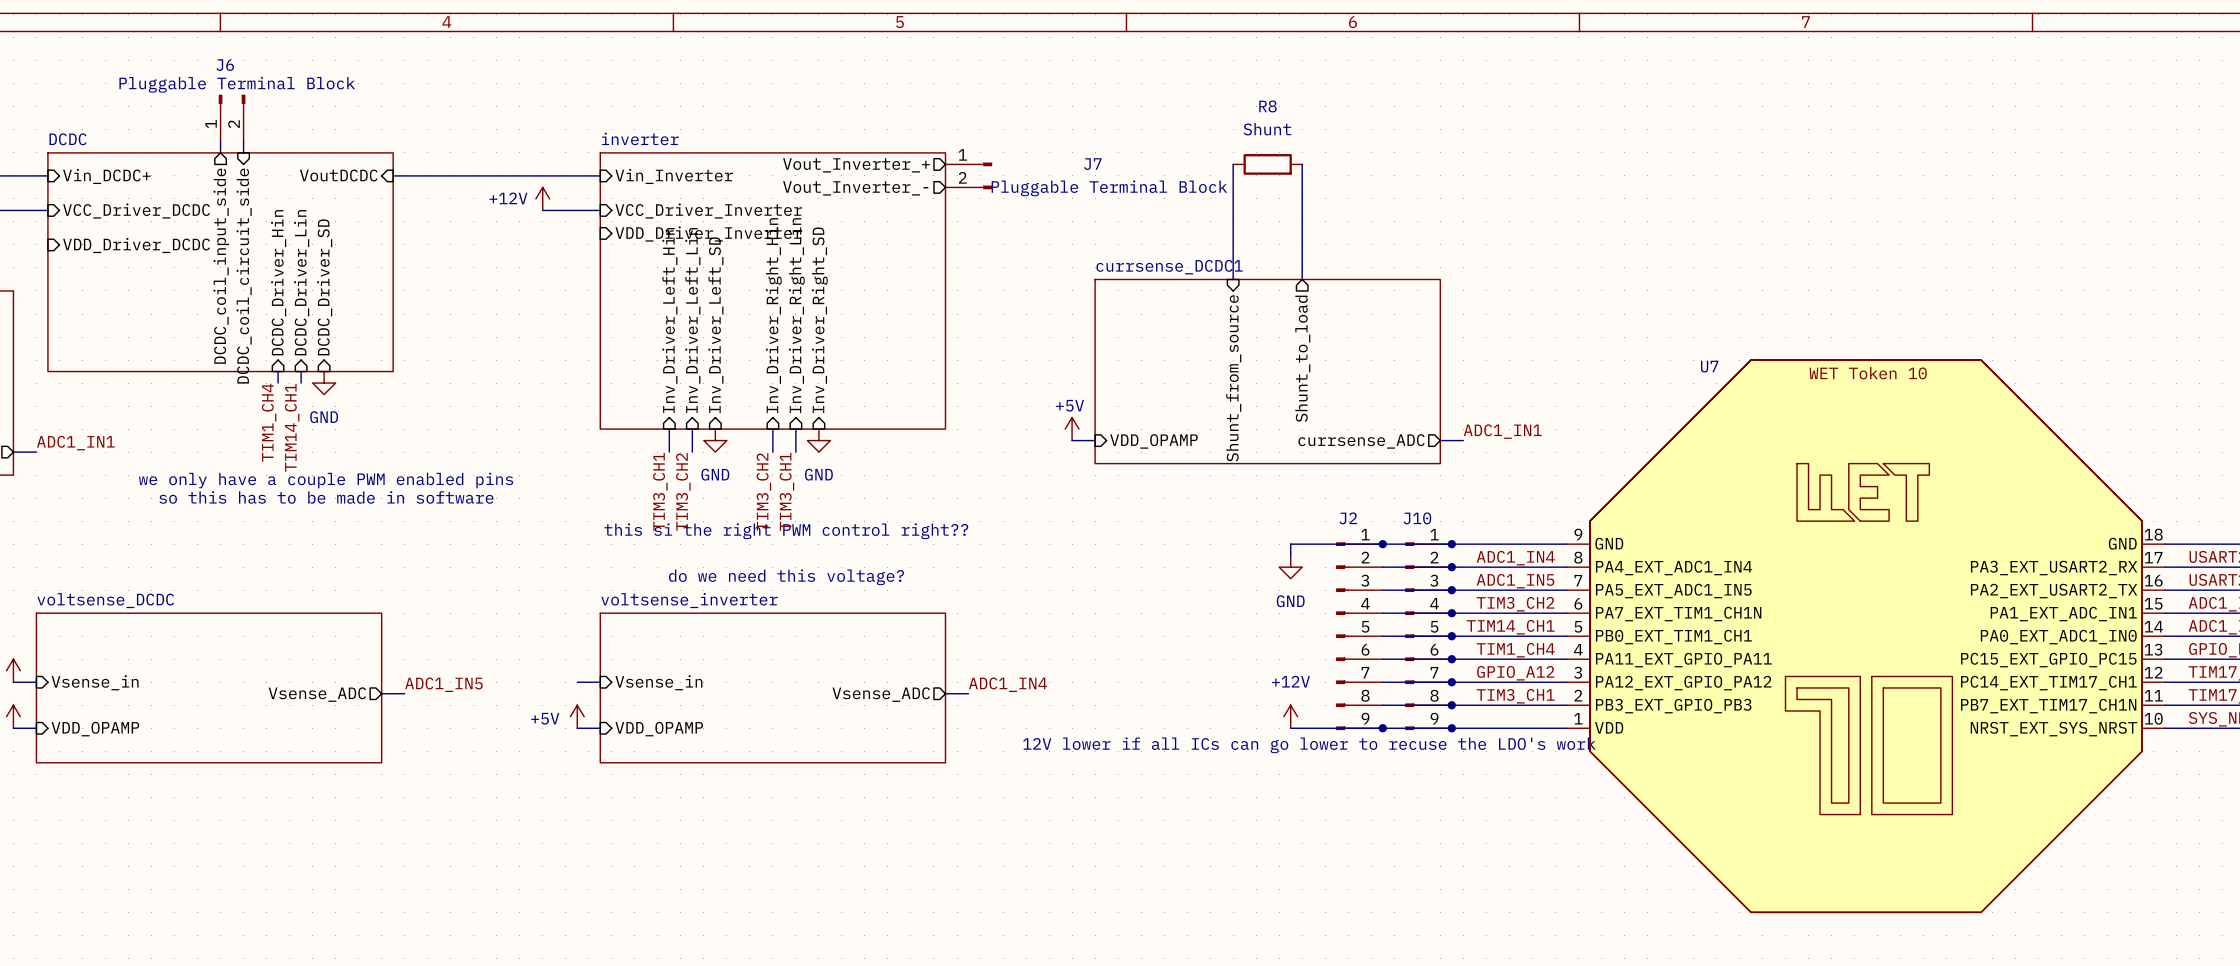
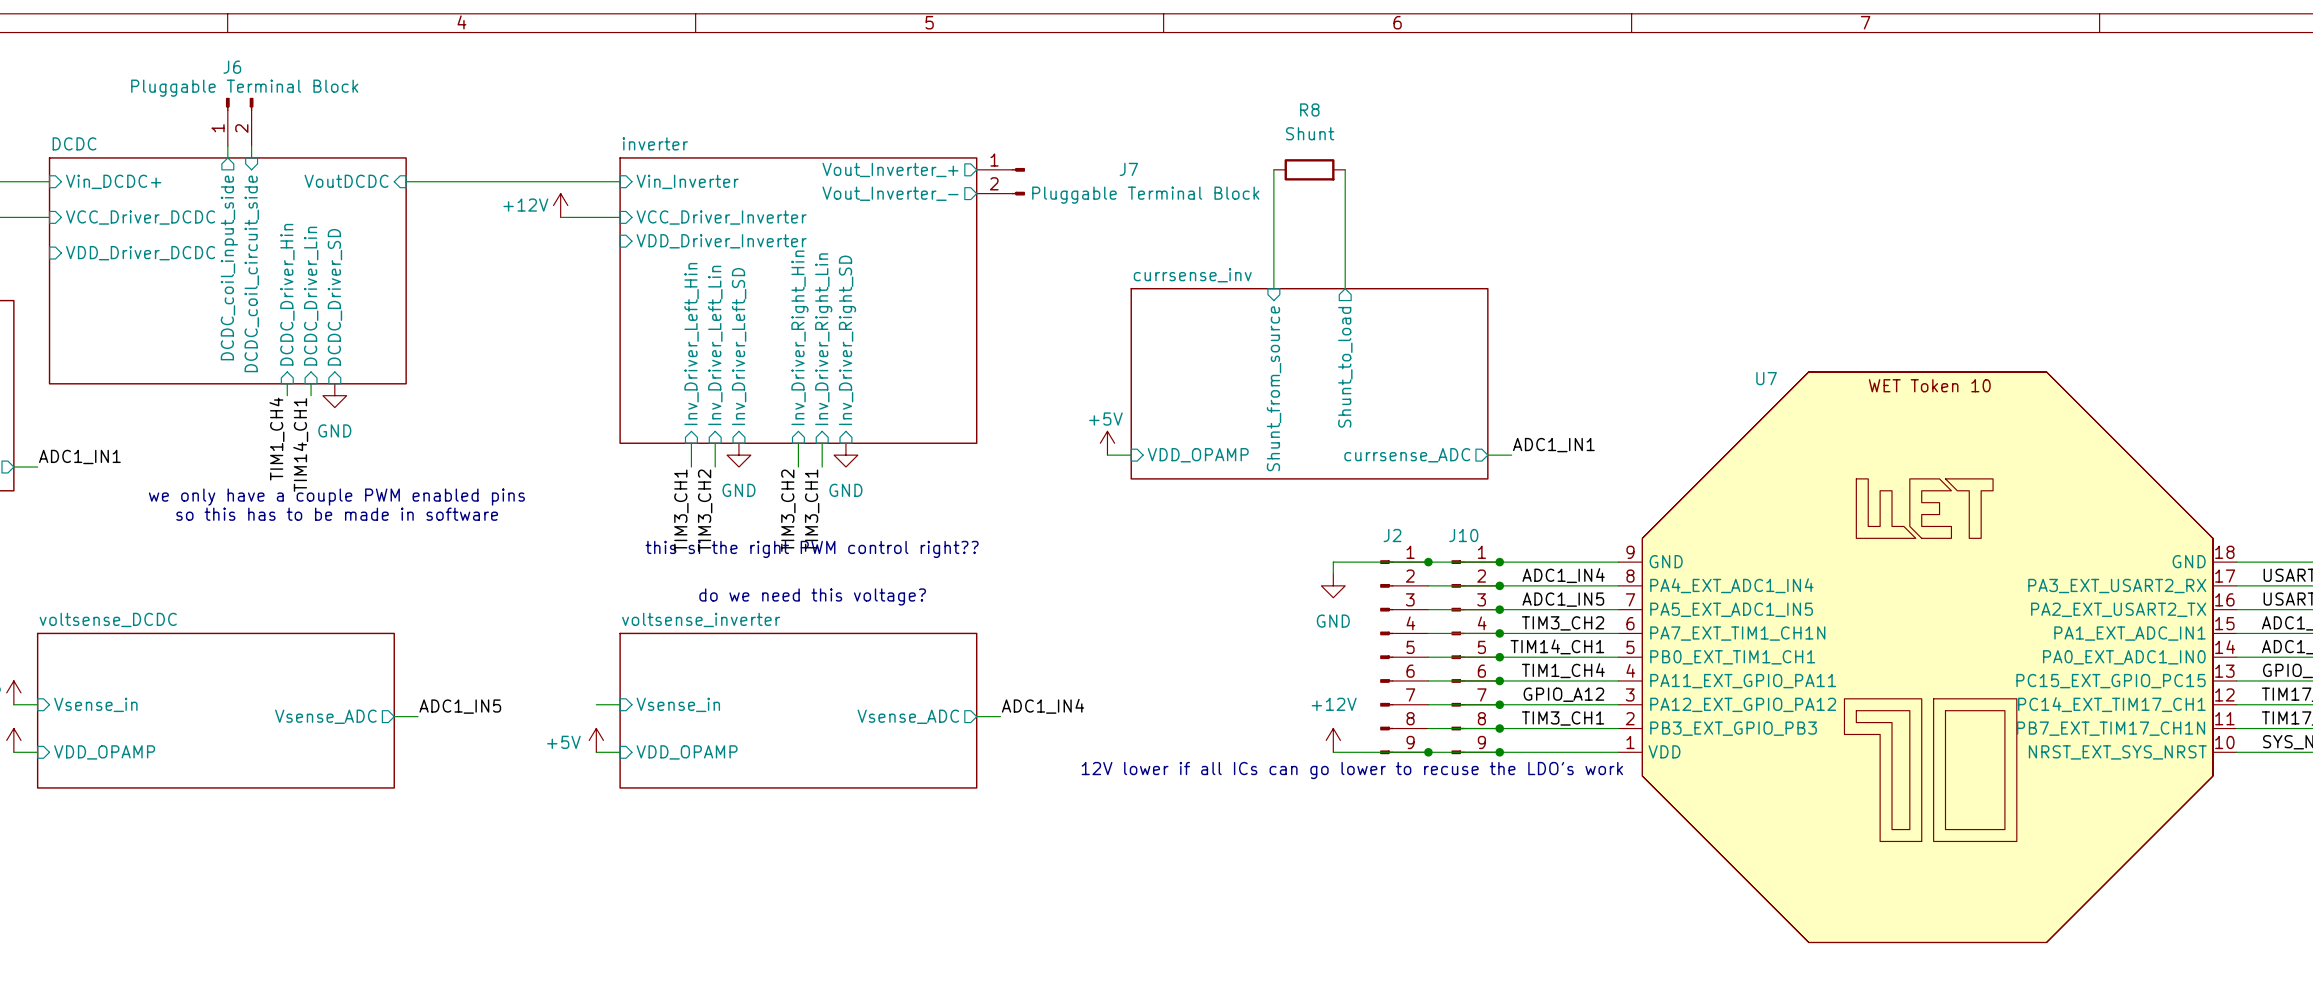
sheet currsense_DCDC1 name: currsense_DCDC1 (1169, 267) -> currsense_inv (1192, 275)

